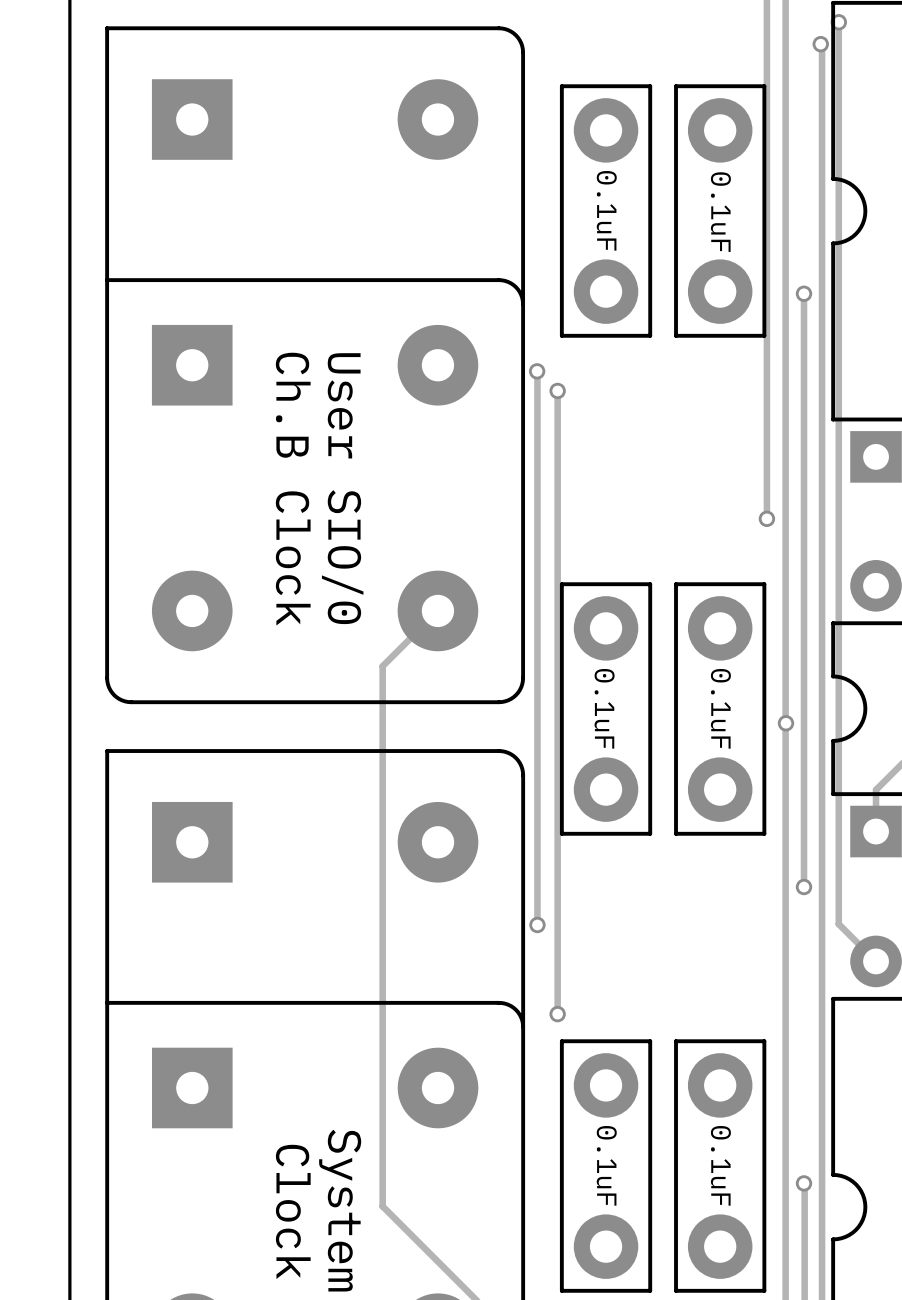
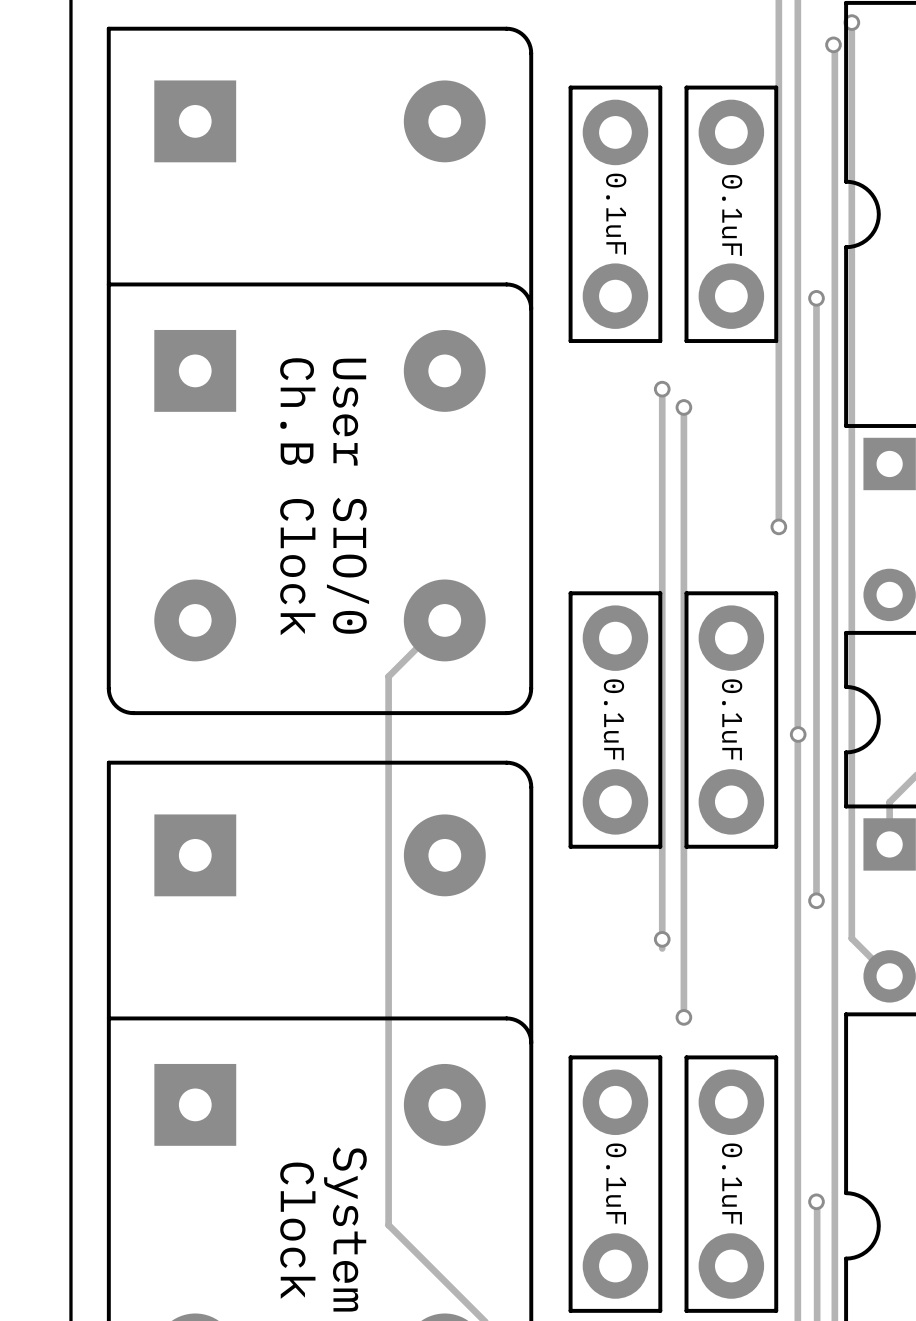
track: (537, 371) (537, 924) -> (662, 386) (662, 948)
via: (537, 371) -> none
via: none -> (662, 389)
track: (557, 390) (557, 1014) -> none
via: (557, 390) -> none
via: none -> (683, 407)
track: none -> (683, 411) (683, 1017)
via: (537, 924) -> none
via: none -> (662, 939)
via: none -> (683, 1017)
via: (557, 1014) -> none

